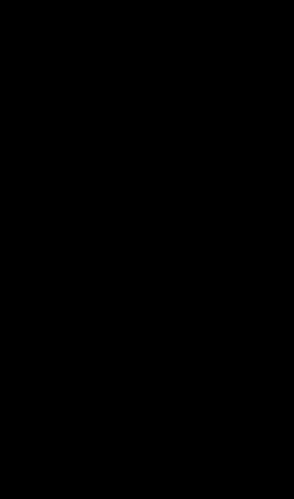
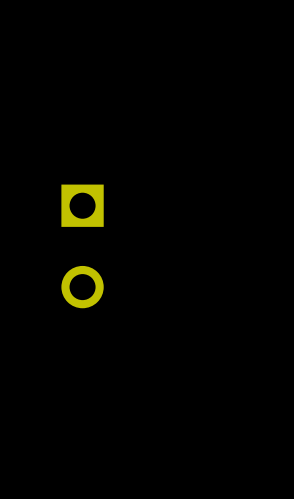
part: none -> (82, 246)

